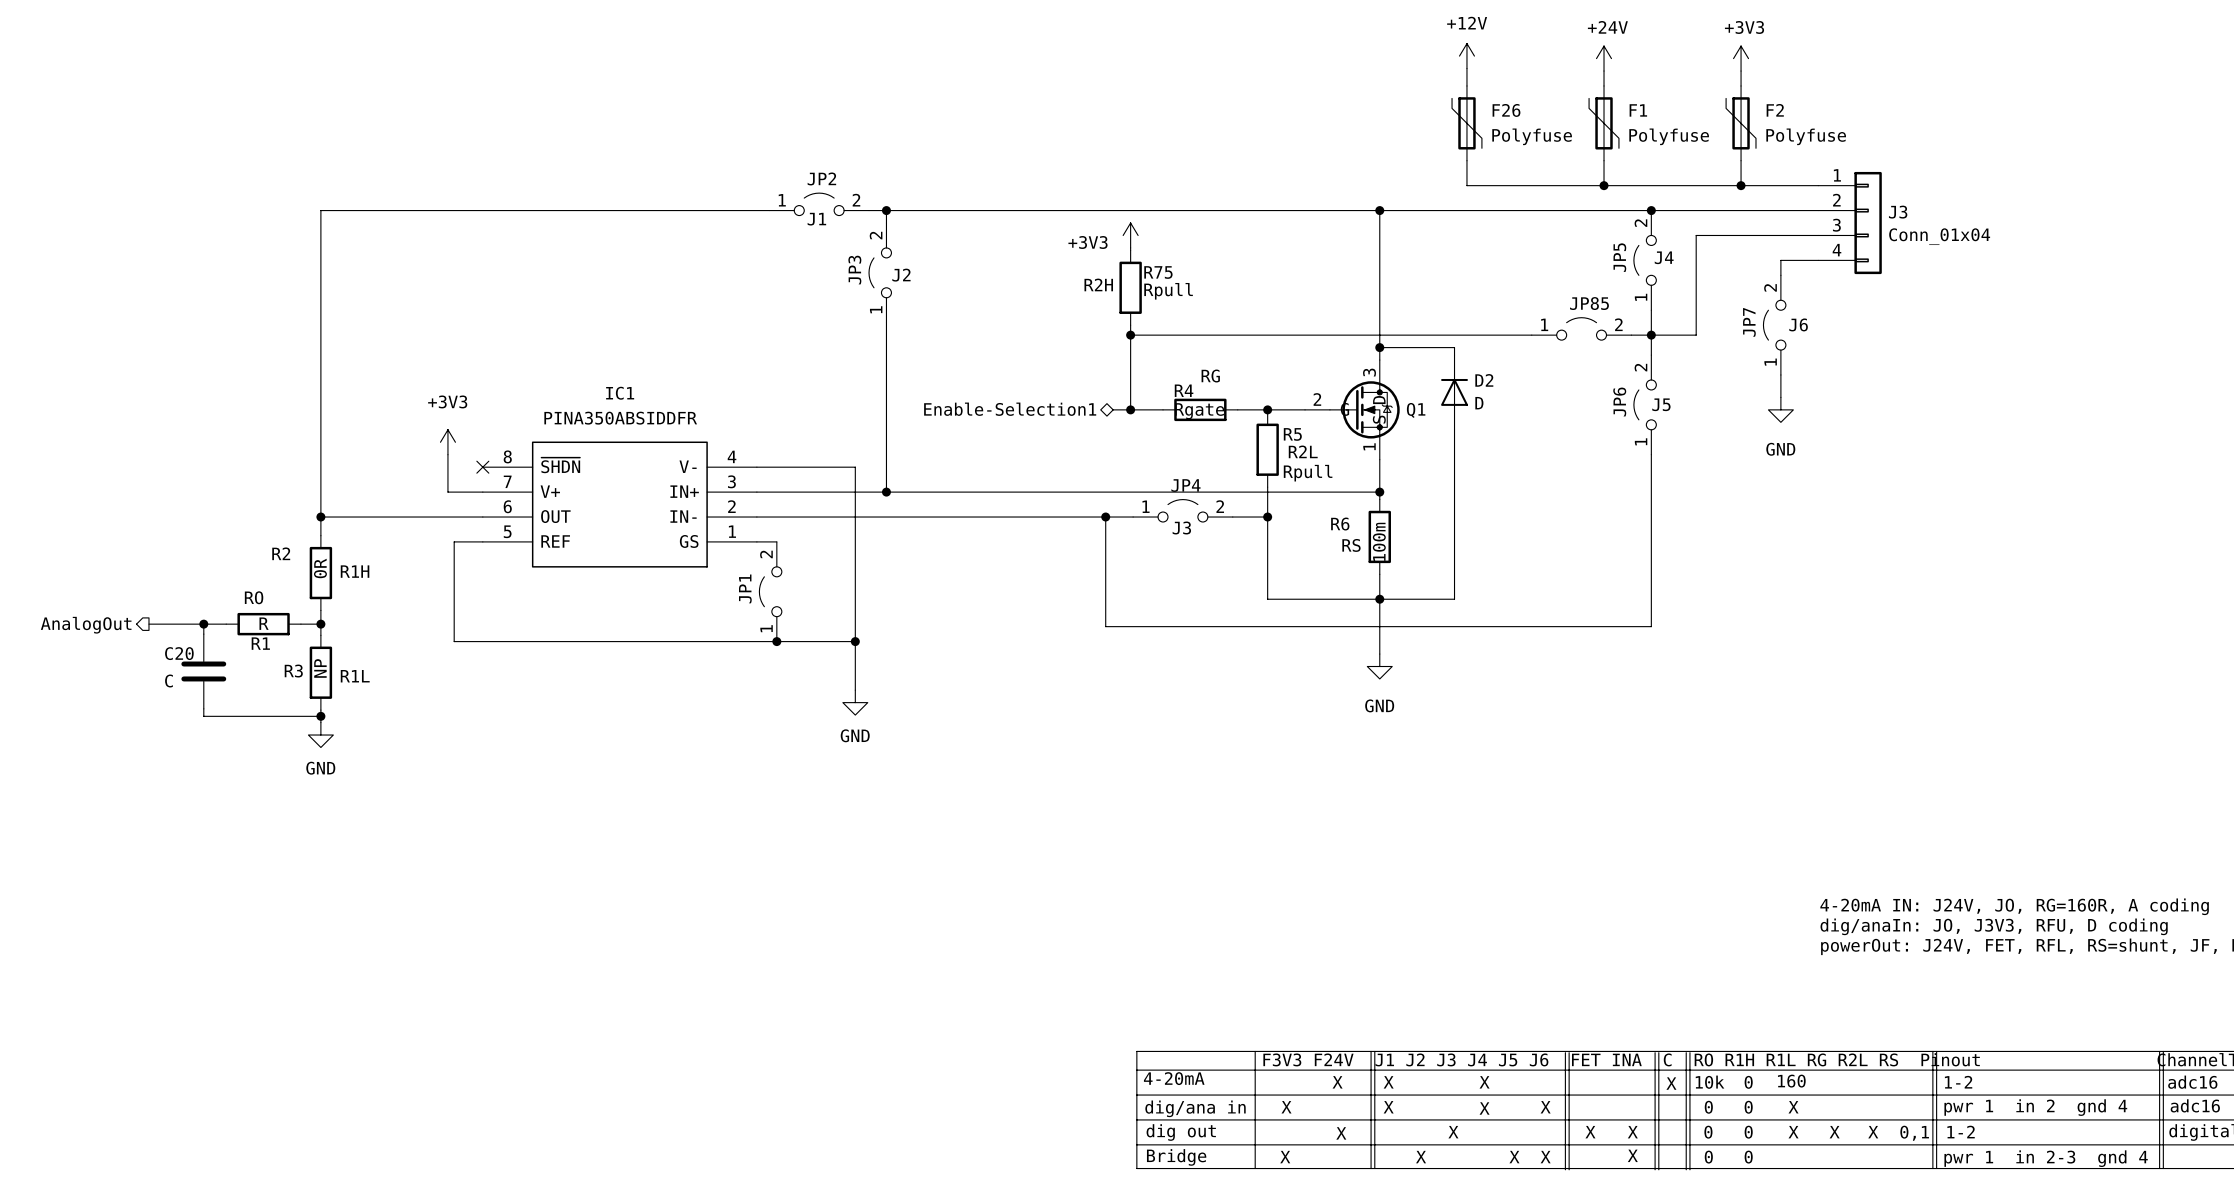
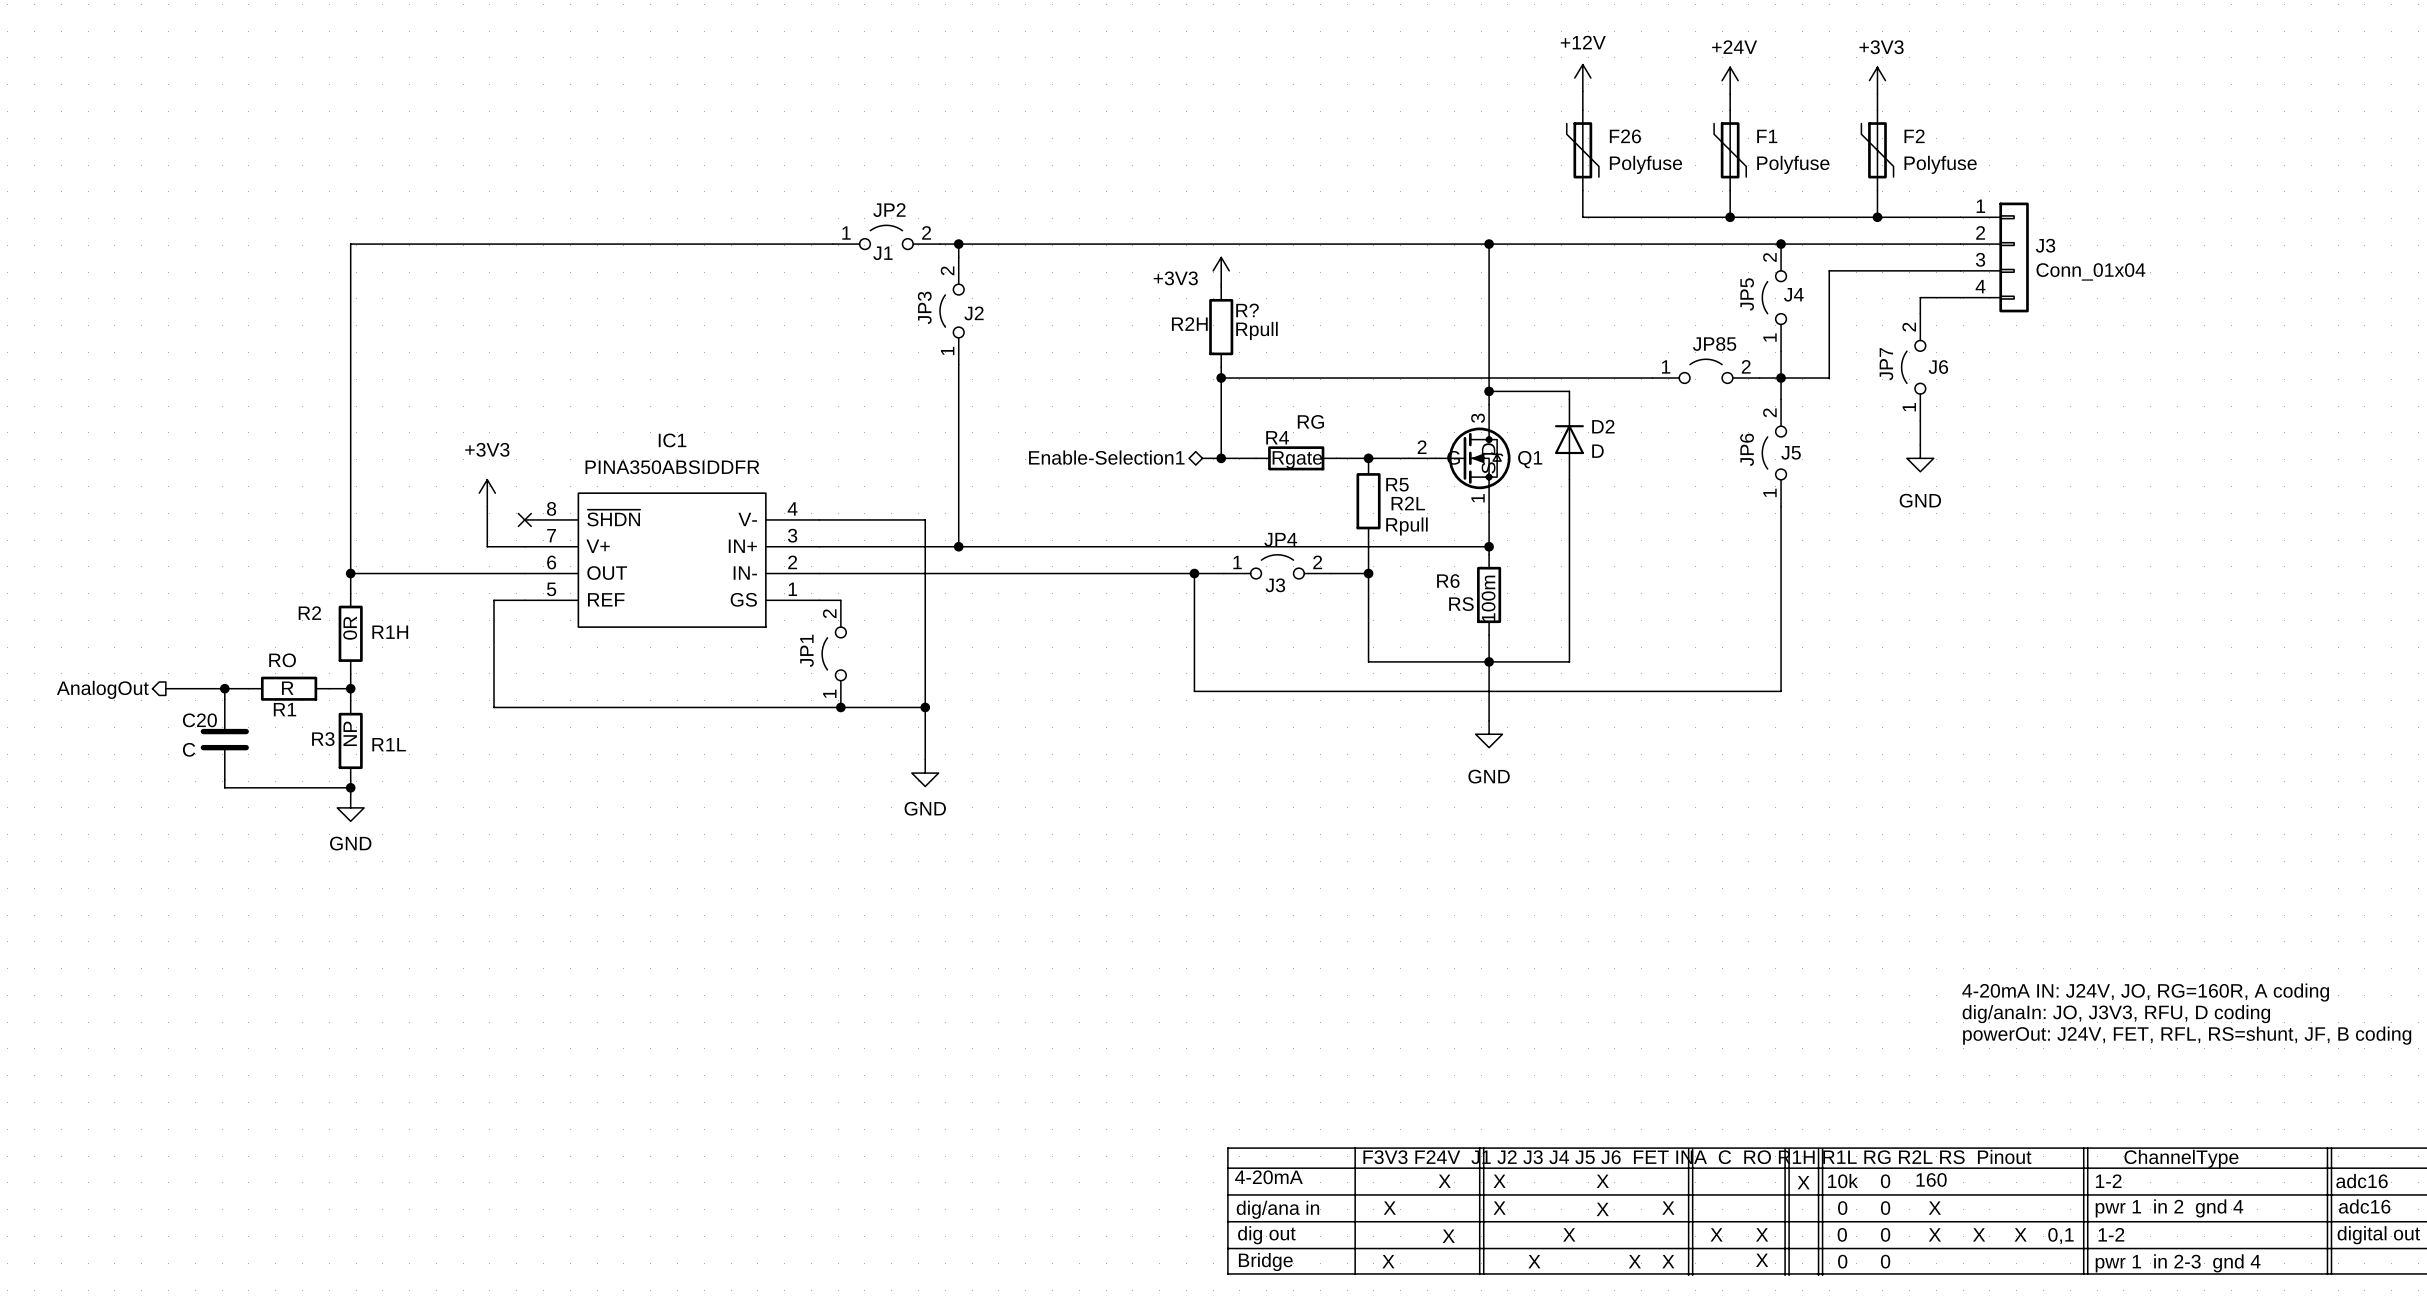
R75 name: R75 (1158, 272) -> R? (1247, 310)

